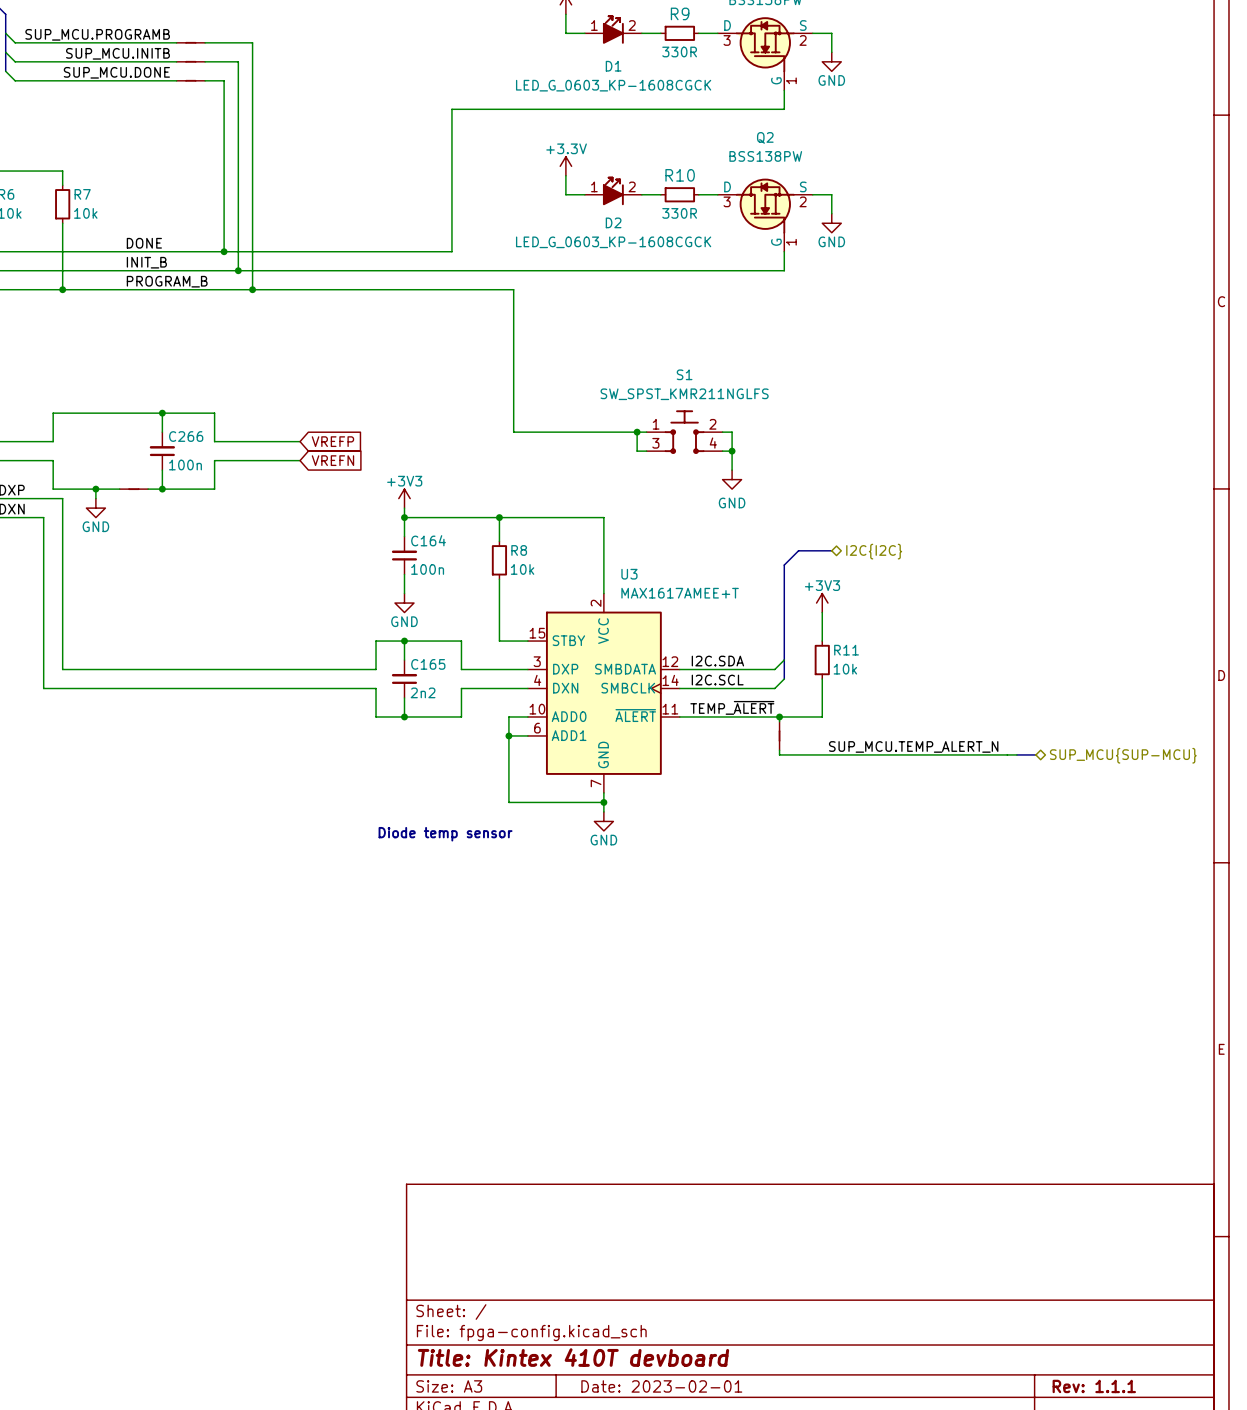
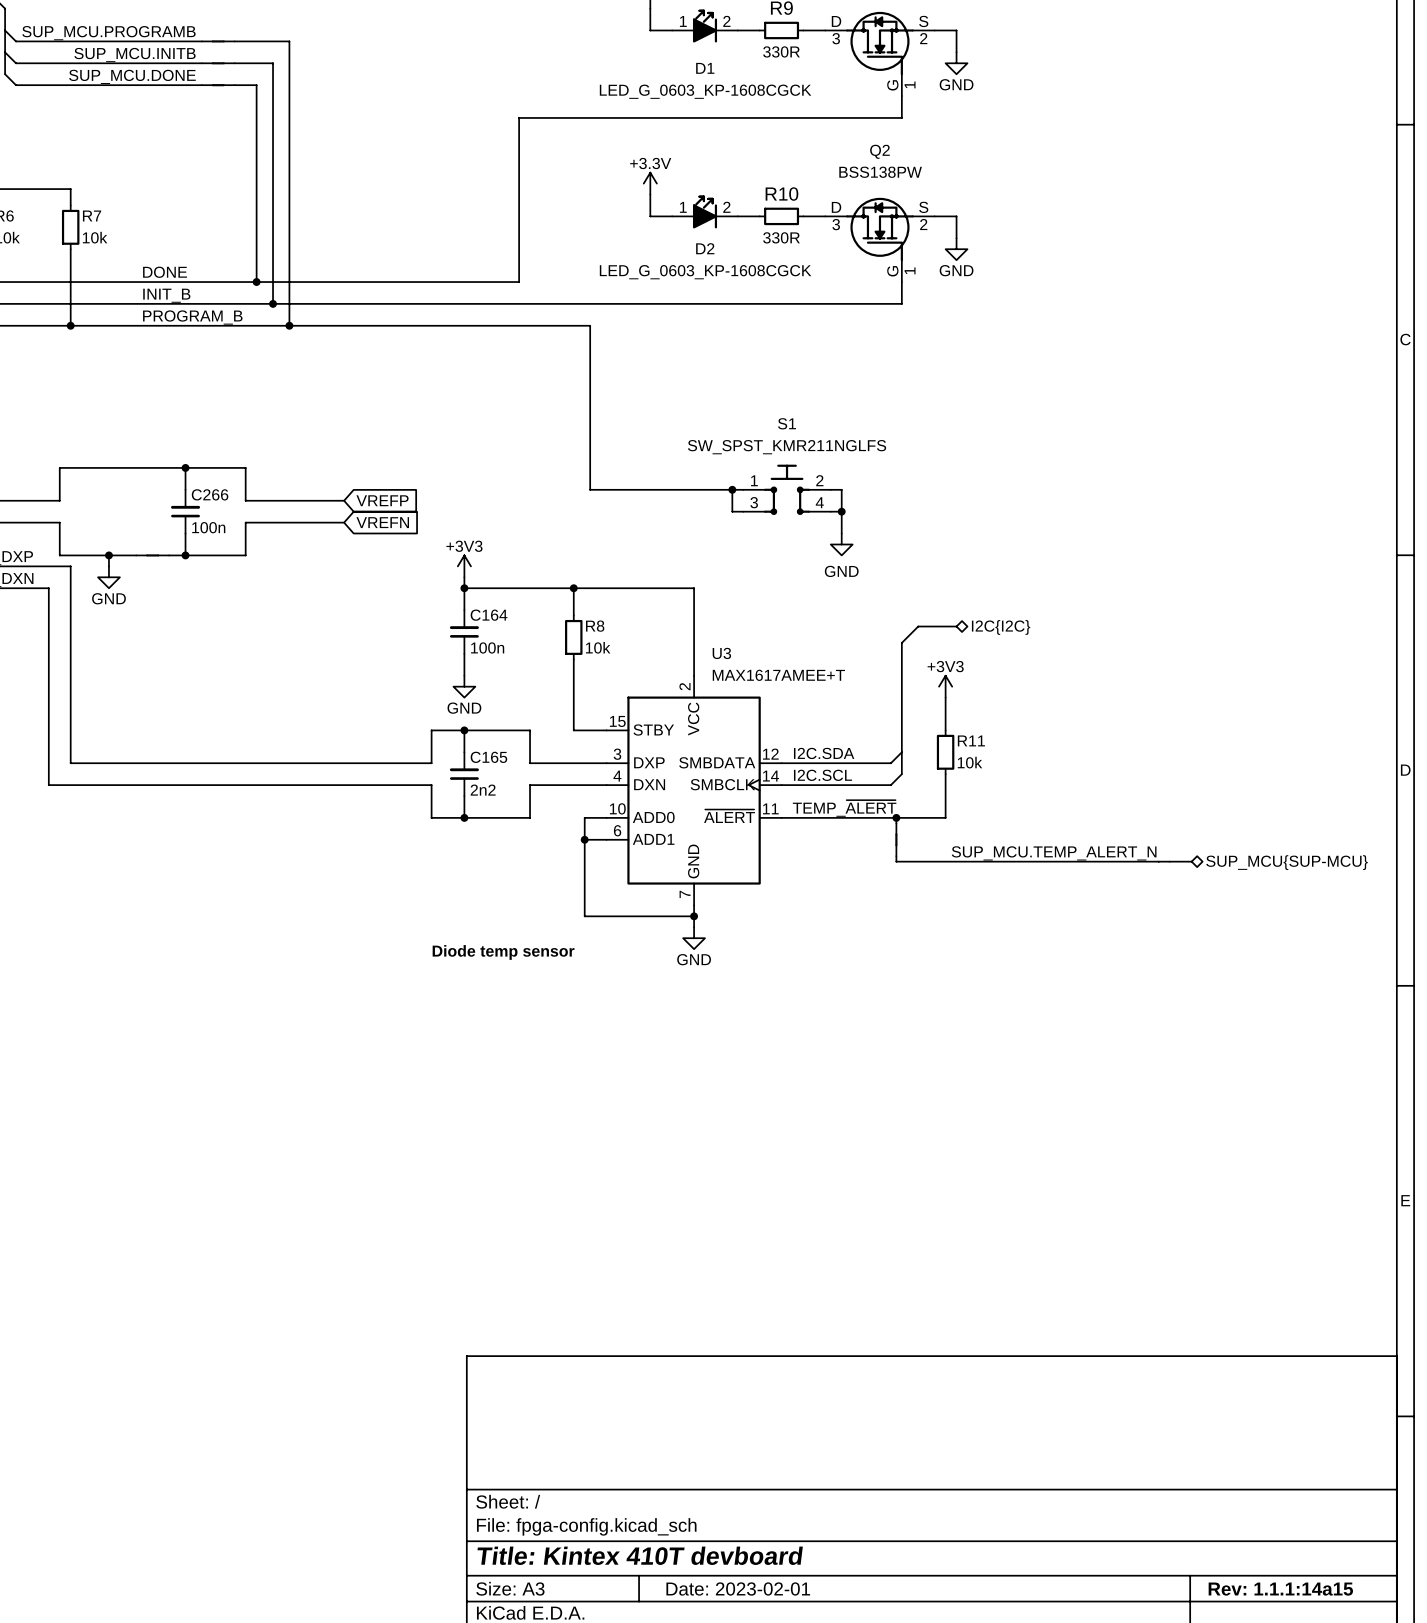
title block: Rev: 1.1.1 (1094, 1386) -> Rev: 1.1.1:14a15 (1280, 1589)

